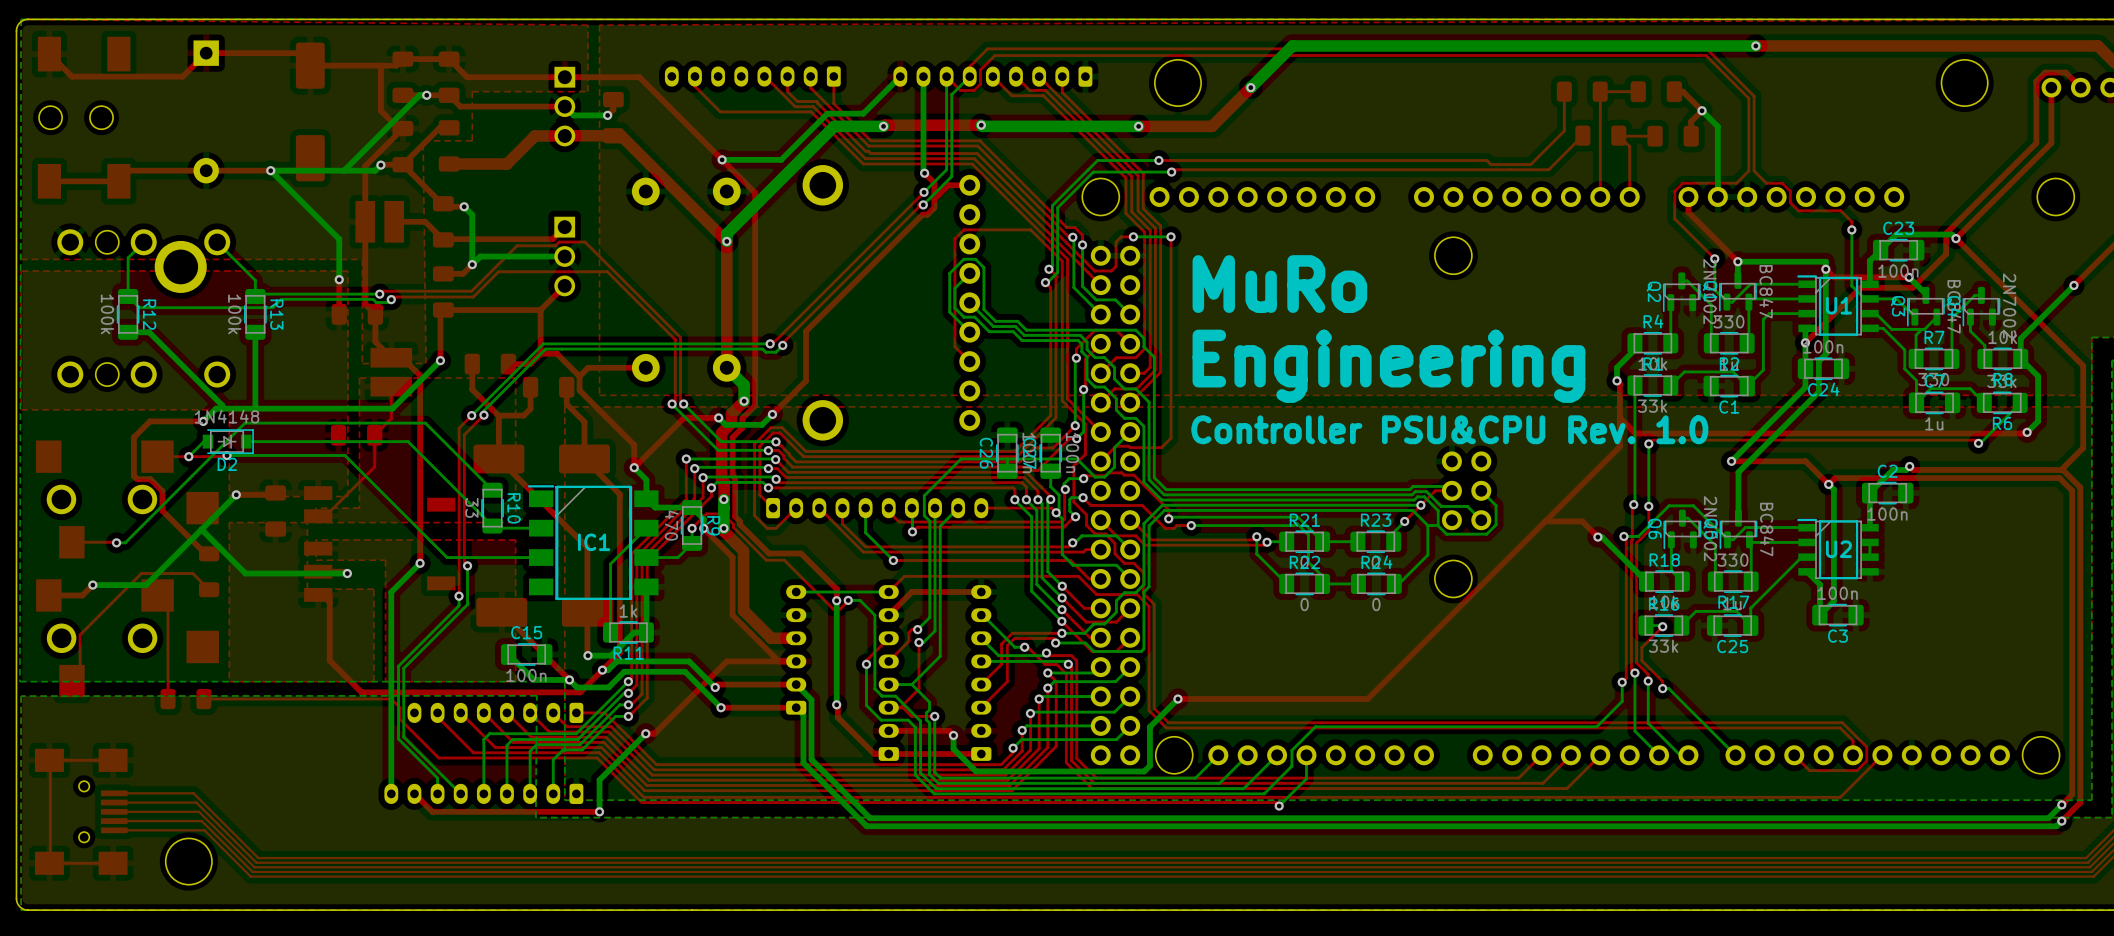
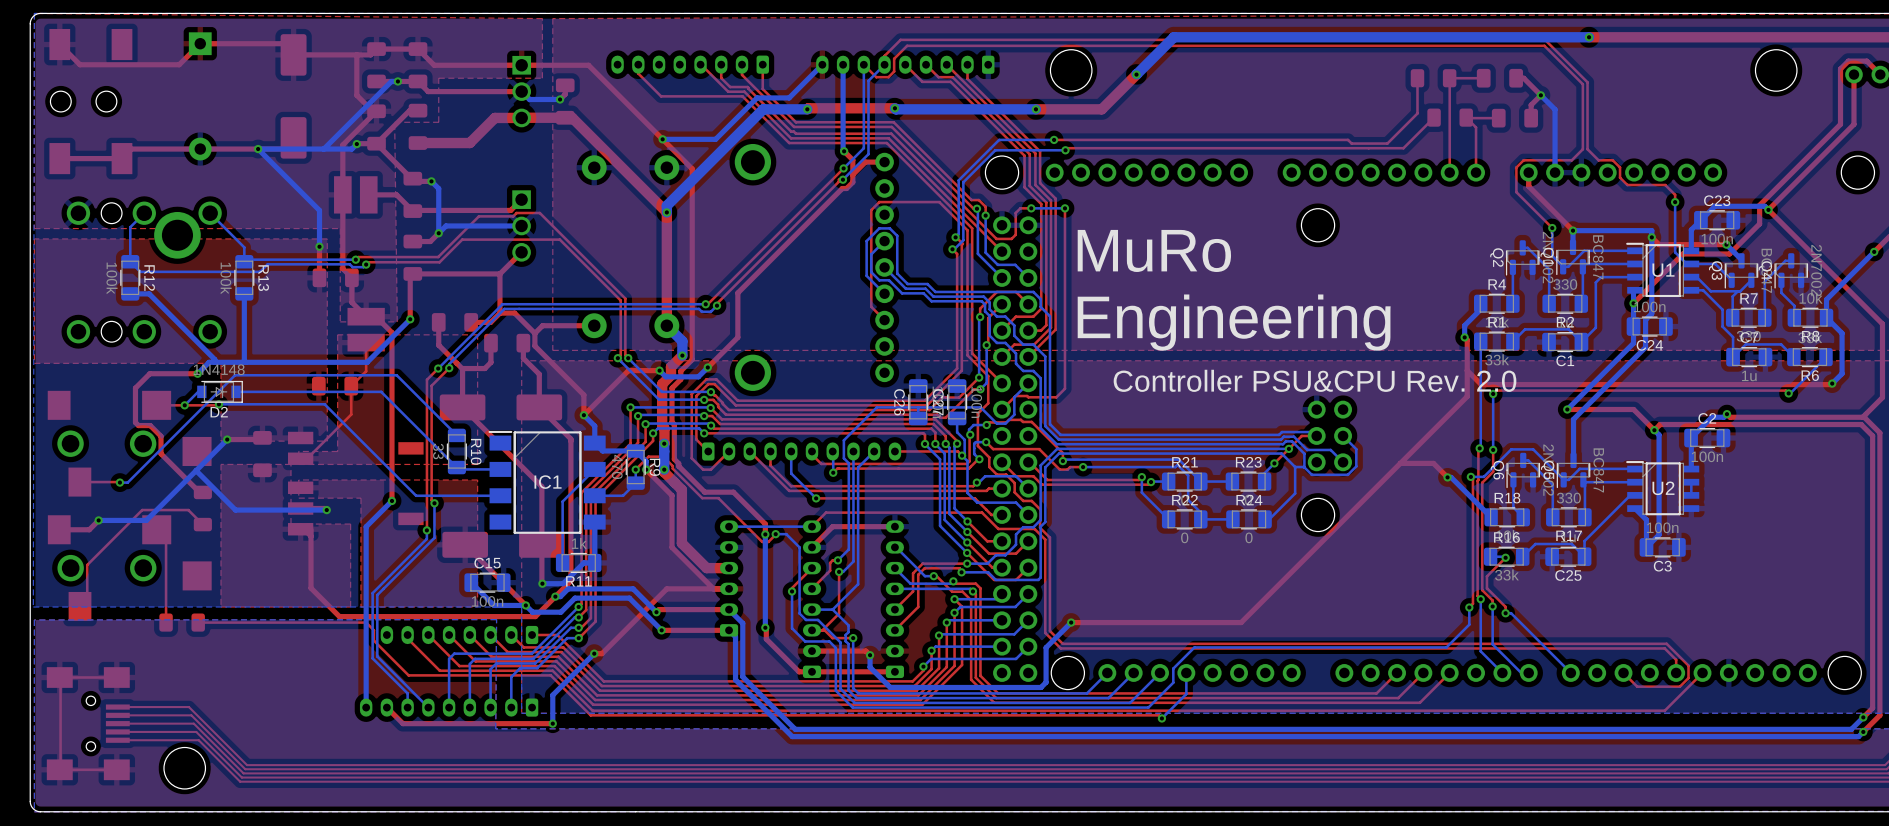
text: Controller PSU&CPU Rev. 1.0 (1449, 429) -> Controller PSU&CPU Rev. 2.0 (1315, 380)

